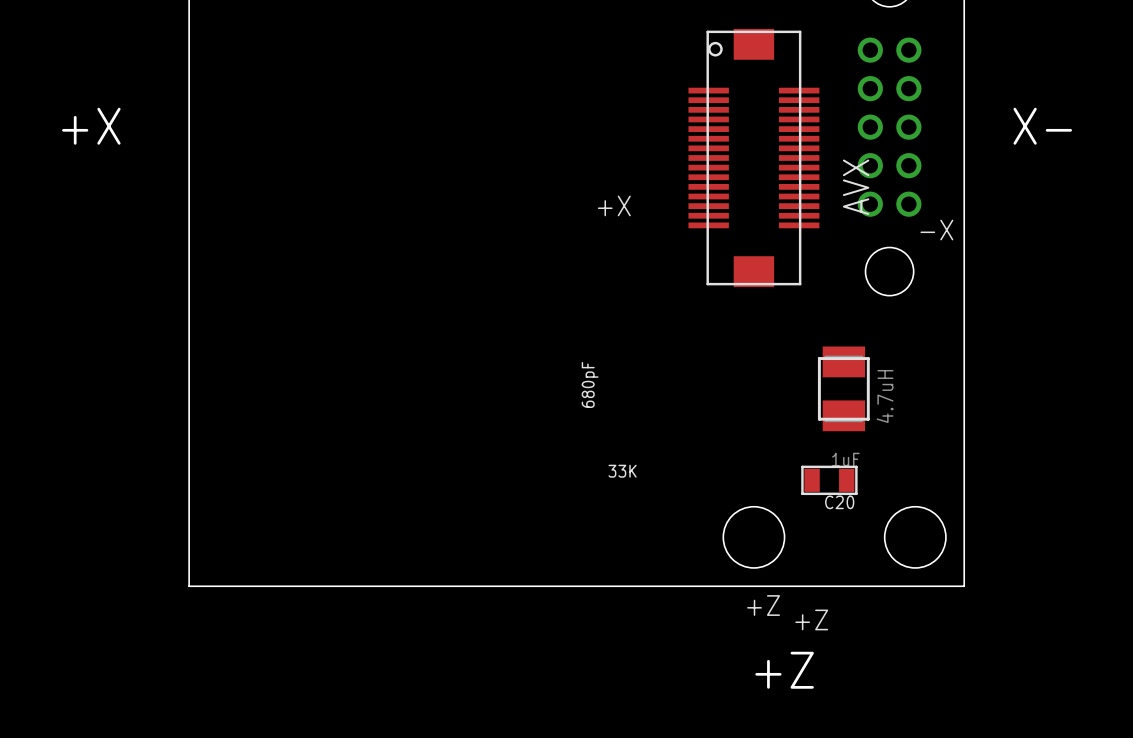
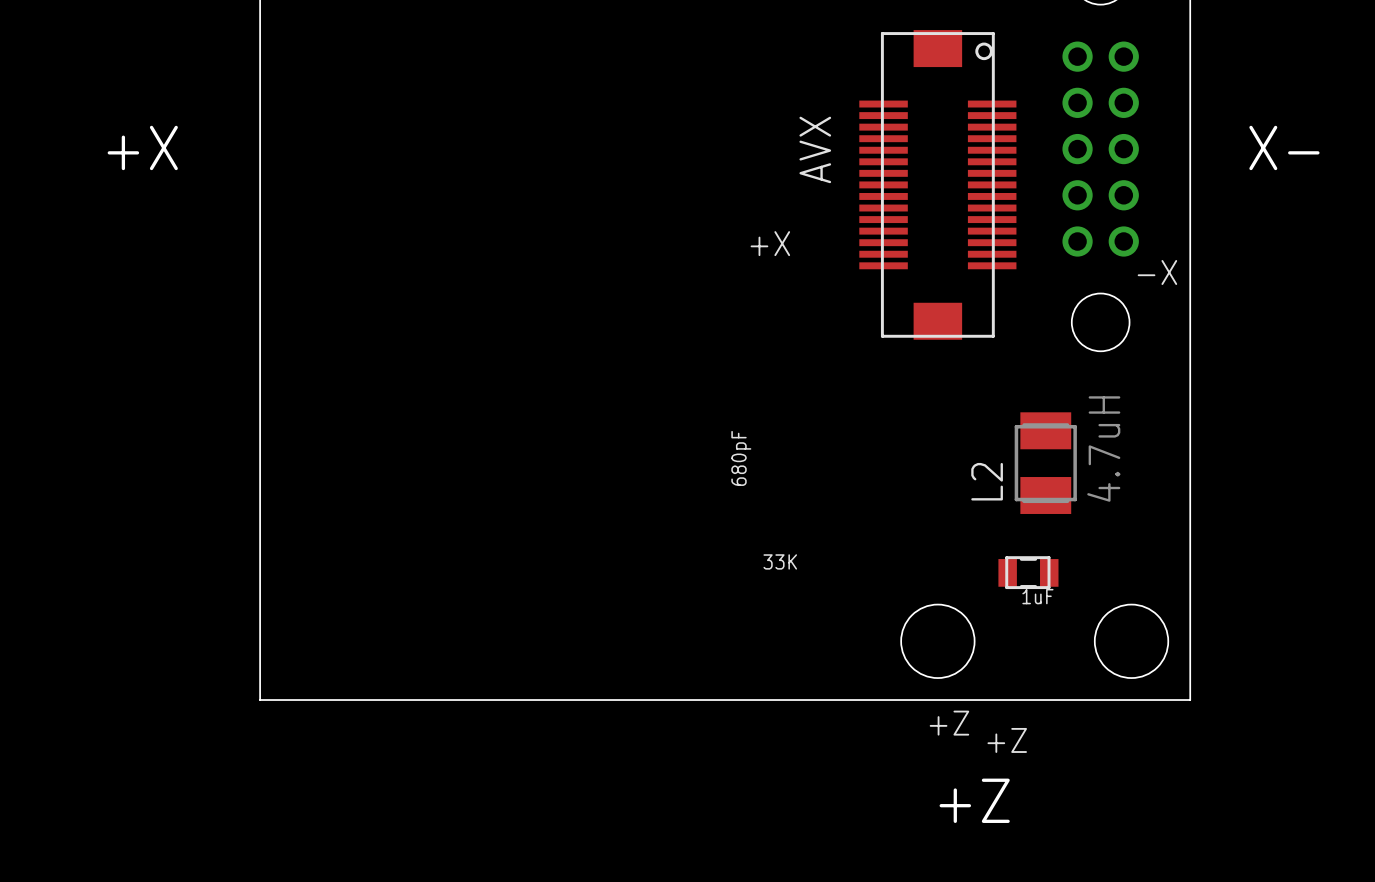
AVX footprint: [688, 28, 820, 288] -> [859, 30, 1017, 340]
AVX name position: AVX (856, 187) -> AVX (815, 149)
part: 4.7uH (843, 388) -> none
L2: none -> 4.7uH (1045, 463)
C20: 1uF (829, 480) -> none
part: none -> 1uF (1028, 572)

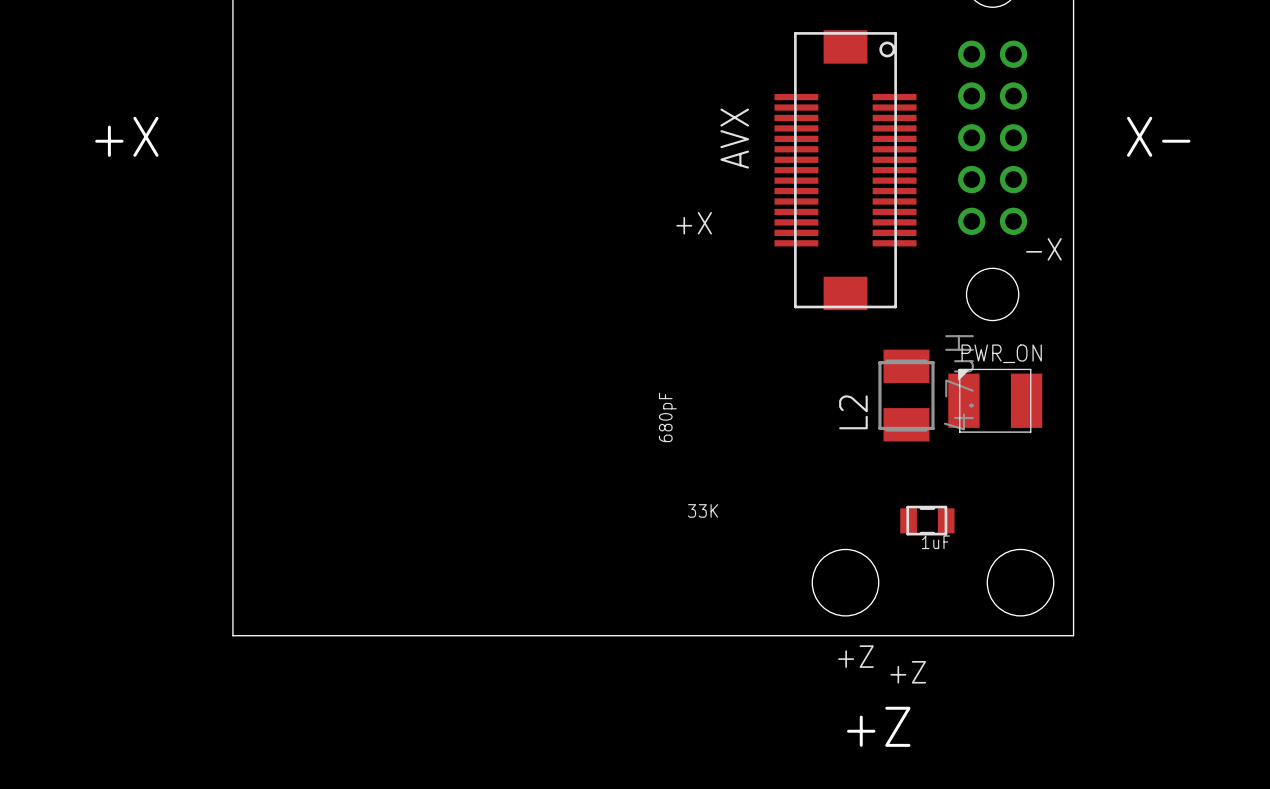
PWR_ON: none -> (995, 400)
L2 position: (1045, 463) -> (906, 395)

